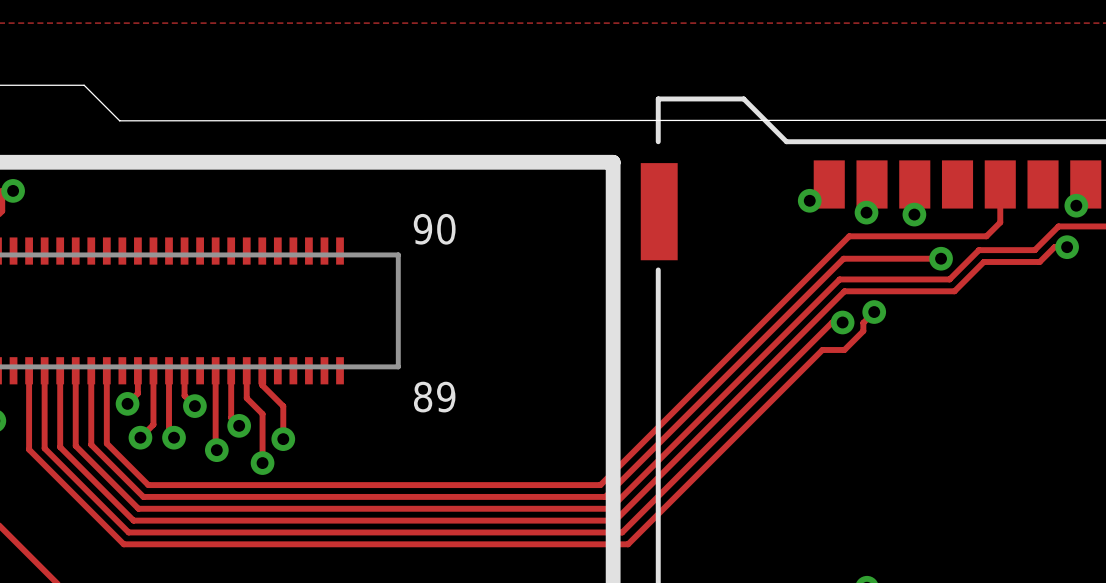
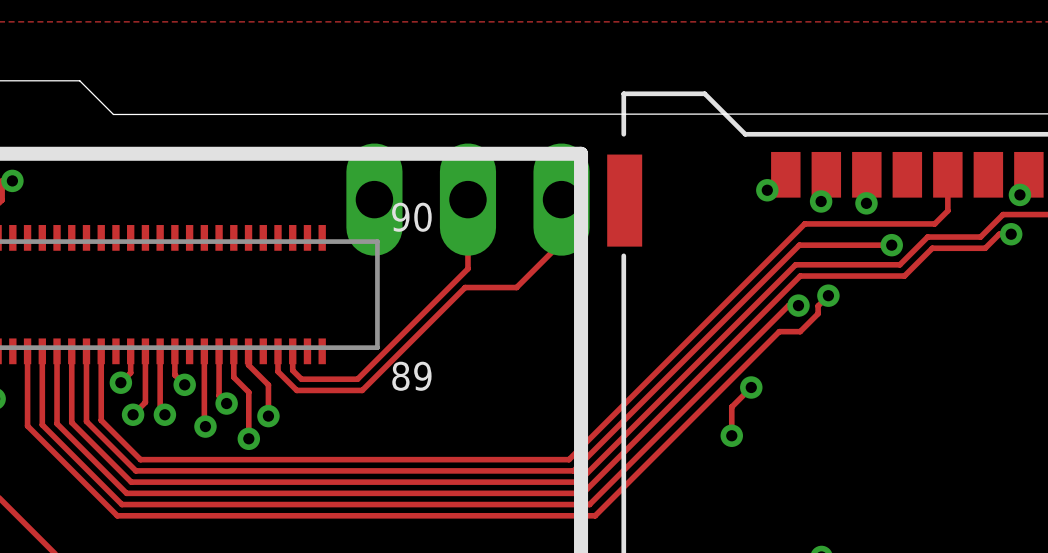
track: none -> (467, 199) (467, 268) (357, 379) (301, 379) (292, 370) (292, 351)
part: none -> (467, 199)
track: none -> (561, 199) (561, 242) (516, 287) (465, 287) (362, 390) (296, 390) (278, 371) (278, 351)
track: none -> (751, 387) (731, 406) (731, 435)
via: none -> (751, 387)
via: none -> (731, 435)

